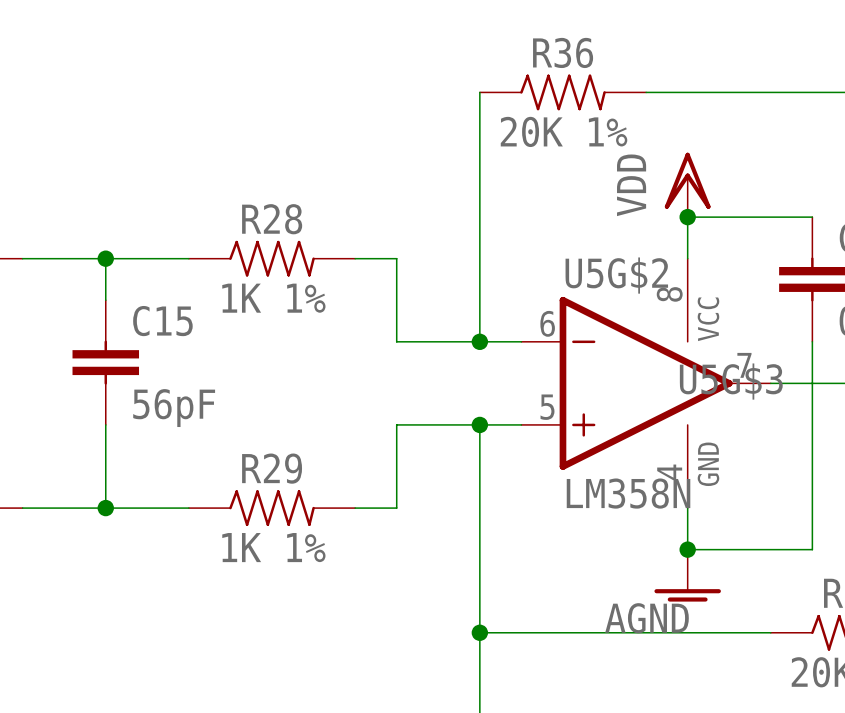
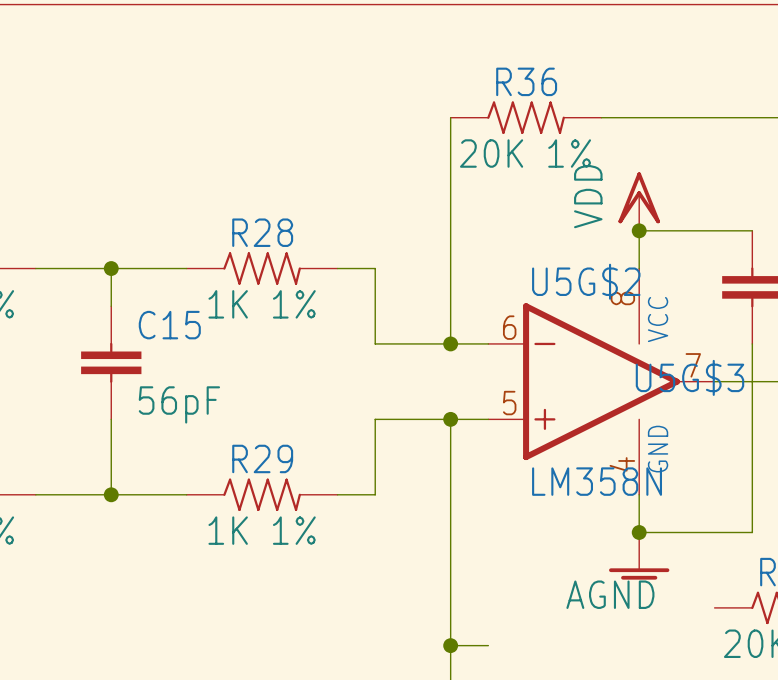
wire: (479, 632) (770, 632) -> none
junction position: (479, 632) -> (450, 645)
wire: none -> (450, 645) (488, 645)

